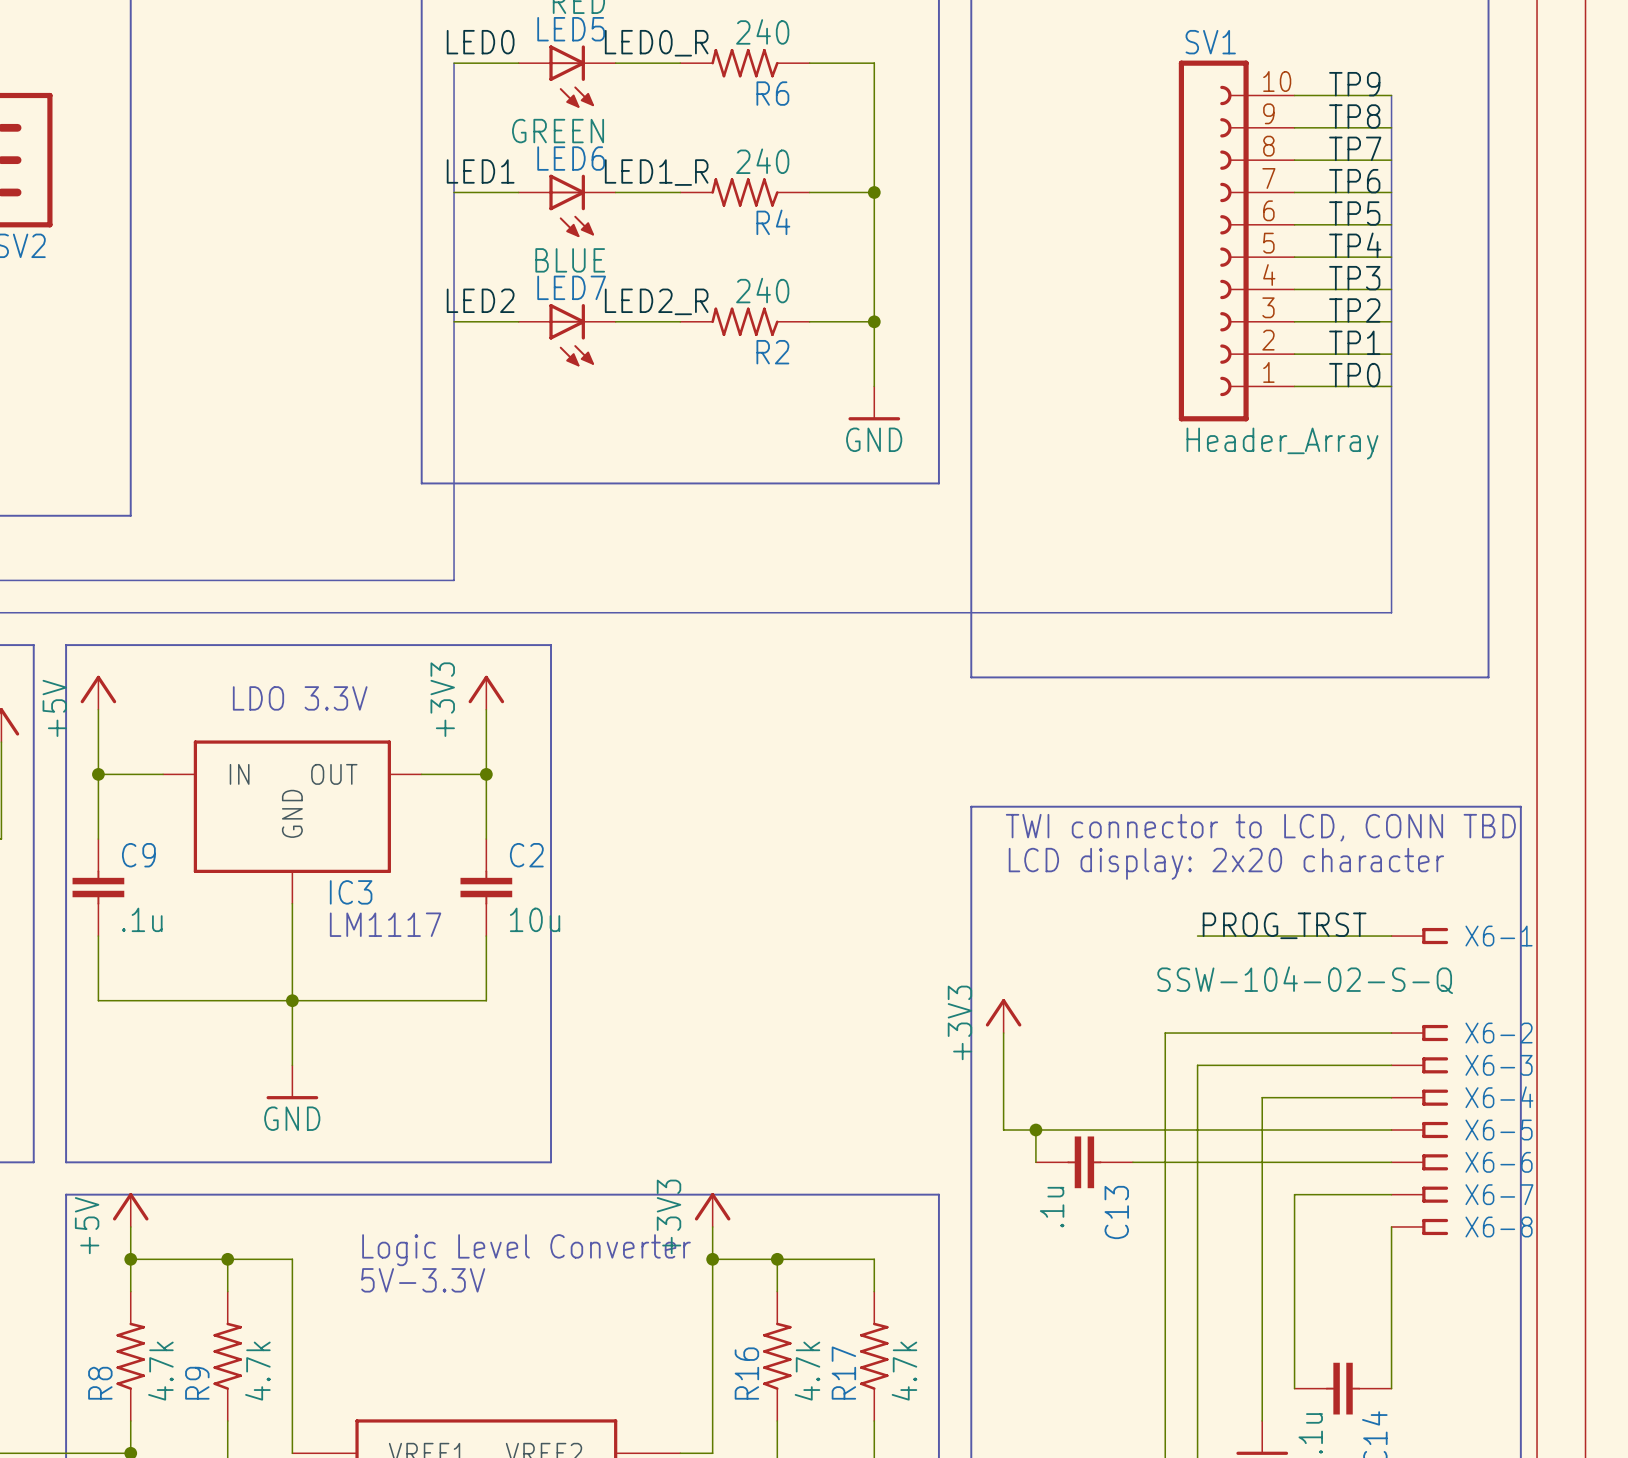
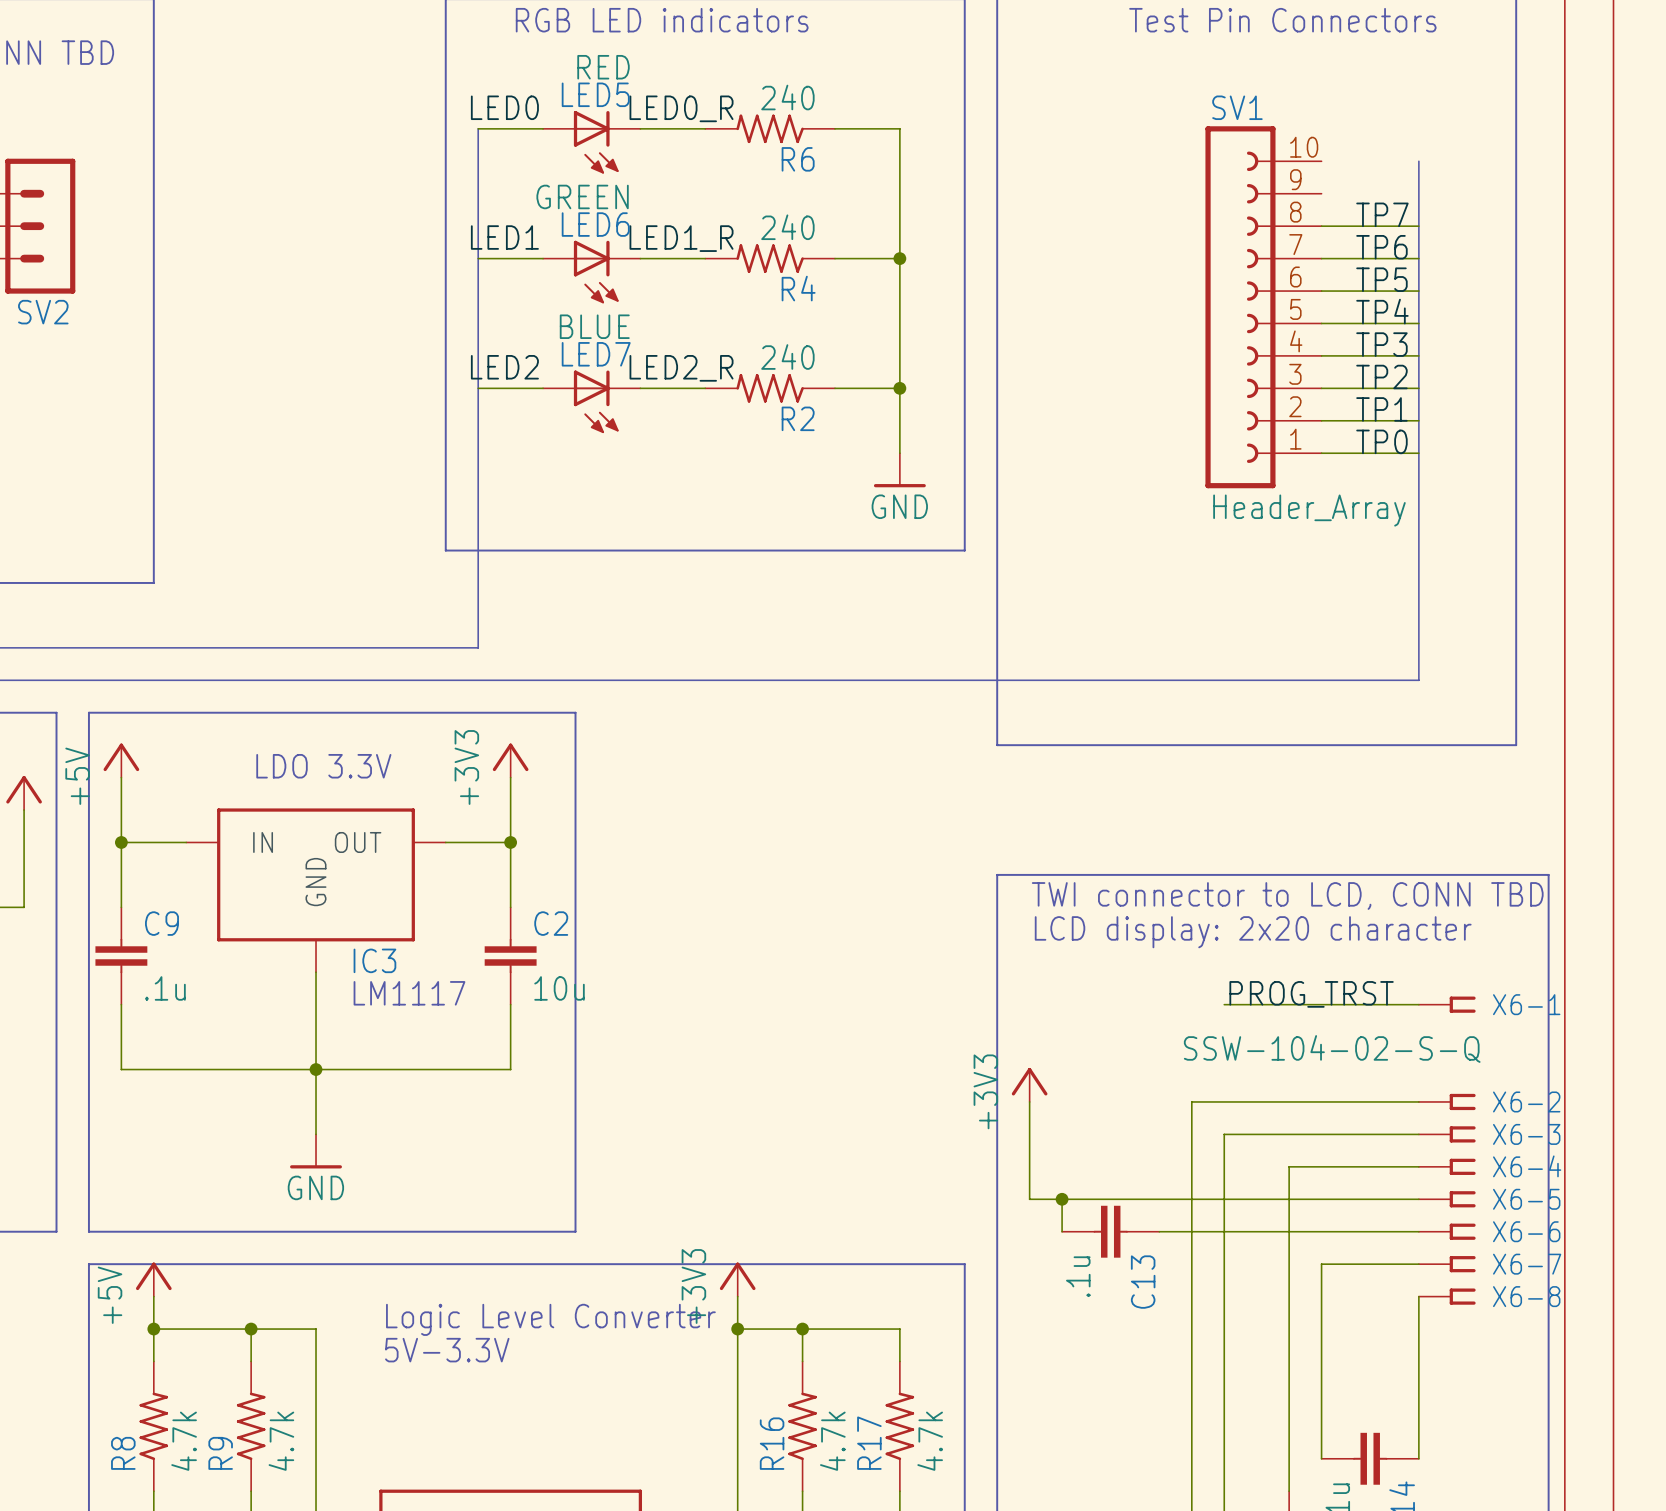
label: TP9 (1354, 84) -> none
wire: (1294, 95) (1391, 95) -> none
label: TP8 (1354, 116) -> none
wire: (1294, 127) (1391, 127) -> none

